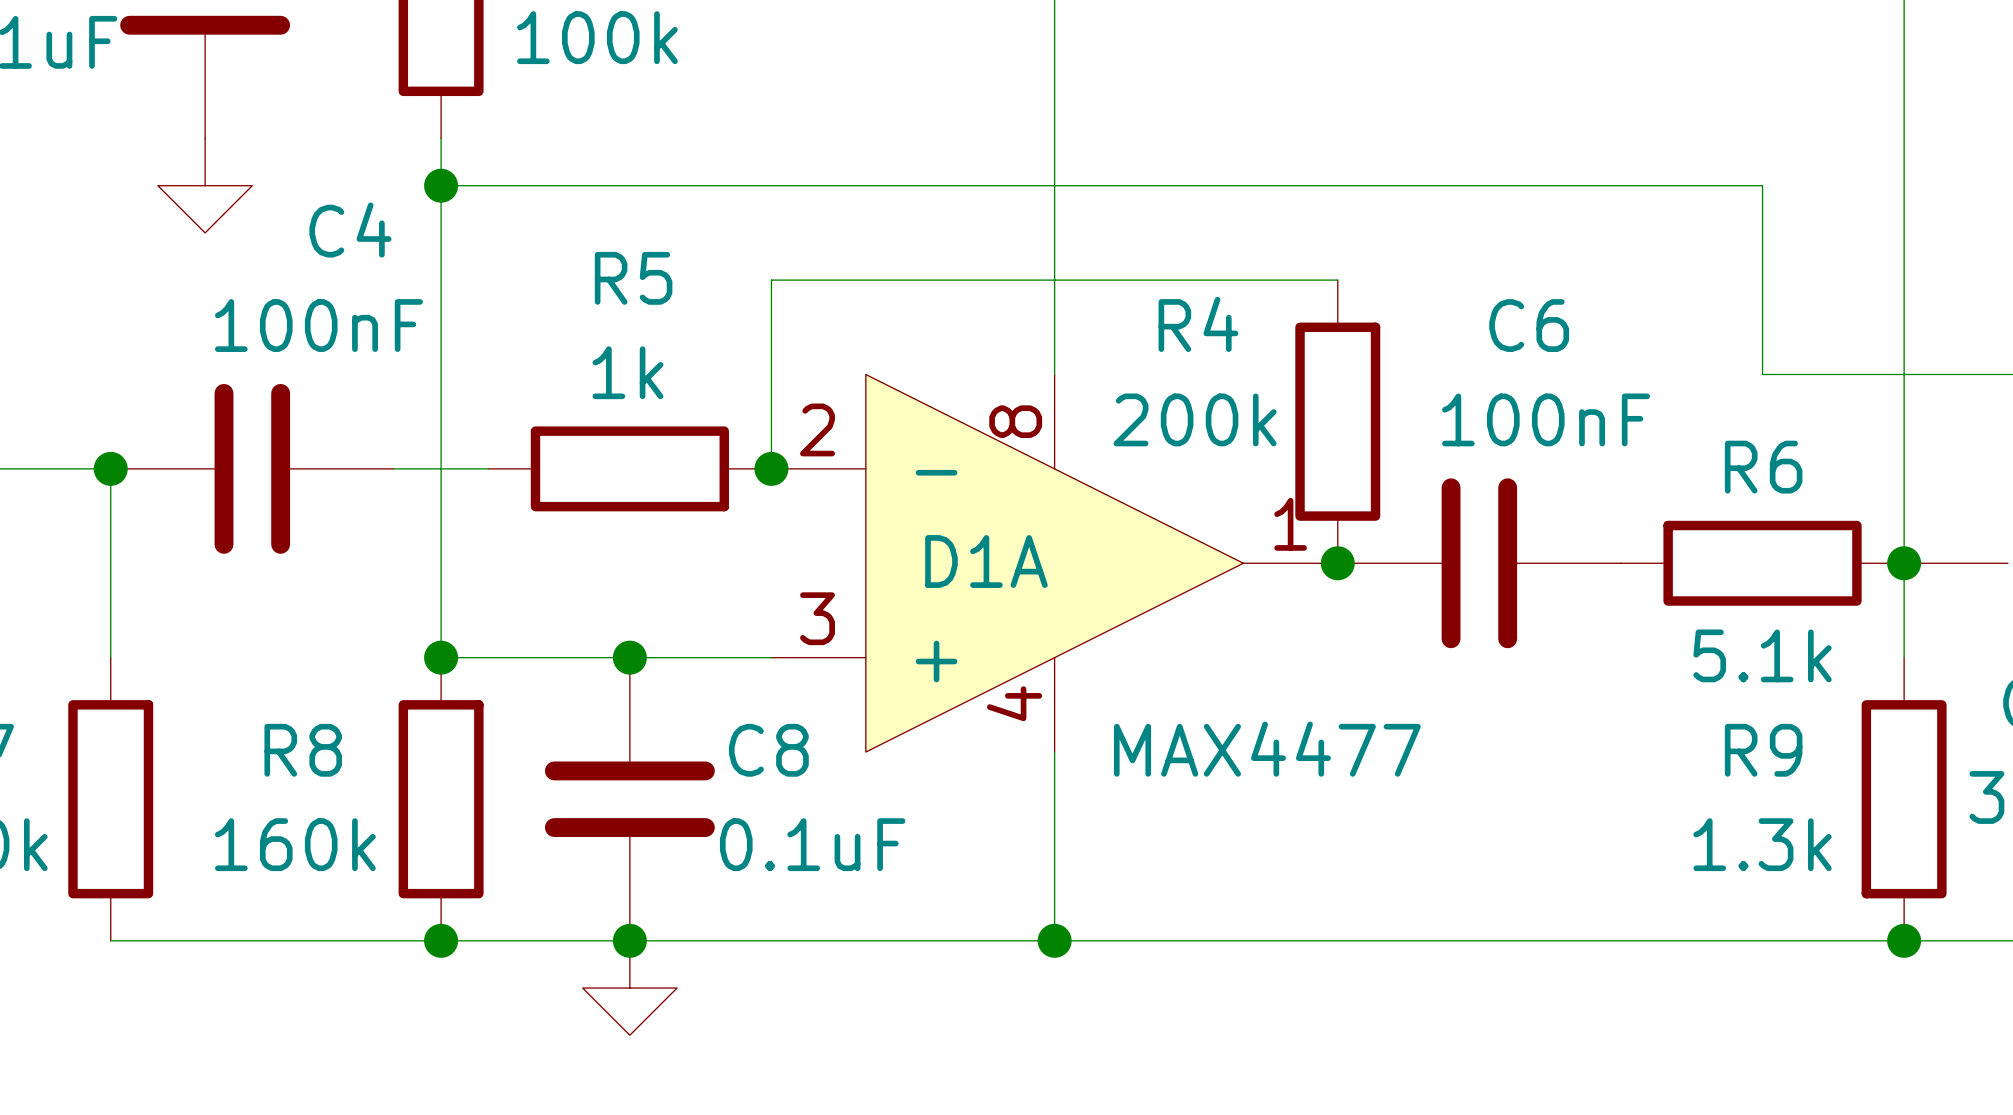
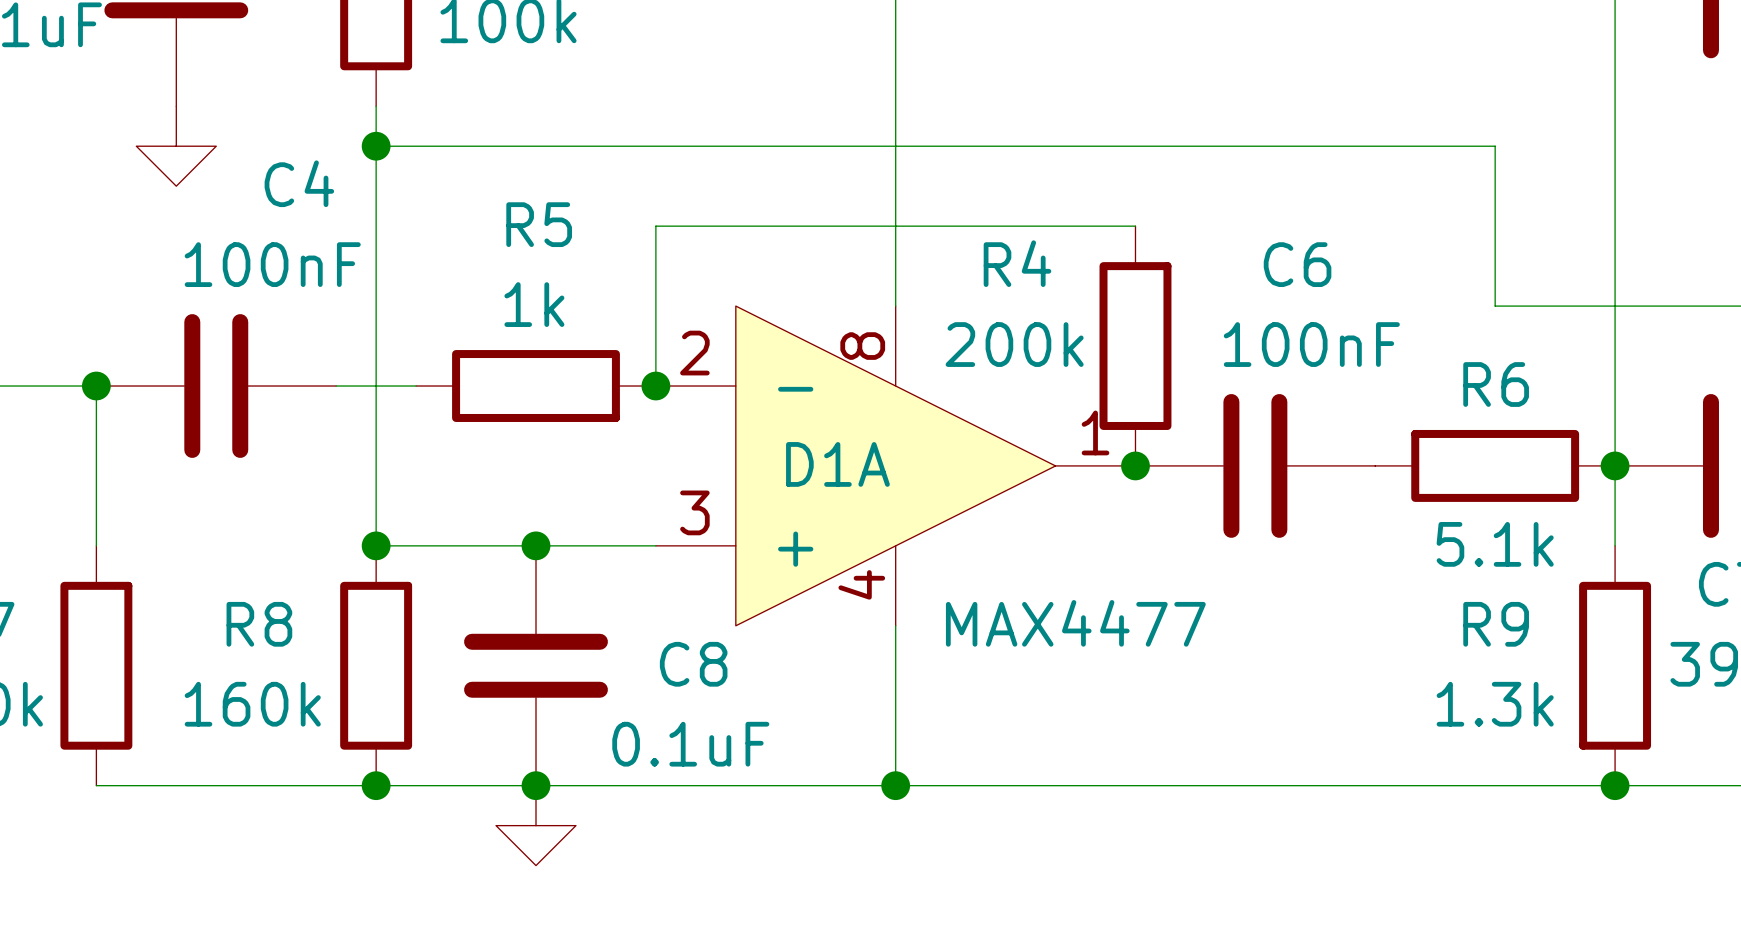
C8 name position: C8 (768, 750) -> C8 (693, 664)
C8 value position: 0.1uF (812, 844) -> 0.1uF (690, 744)

